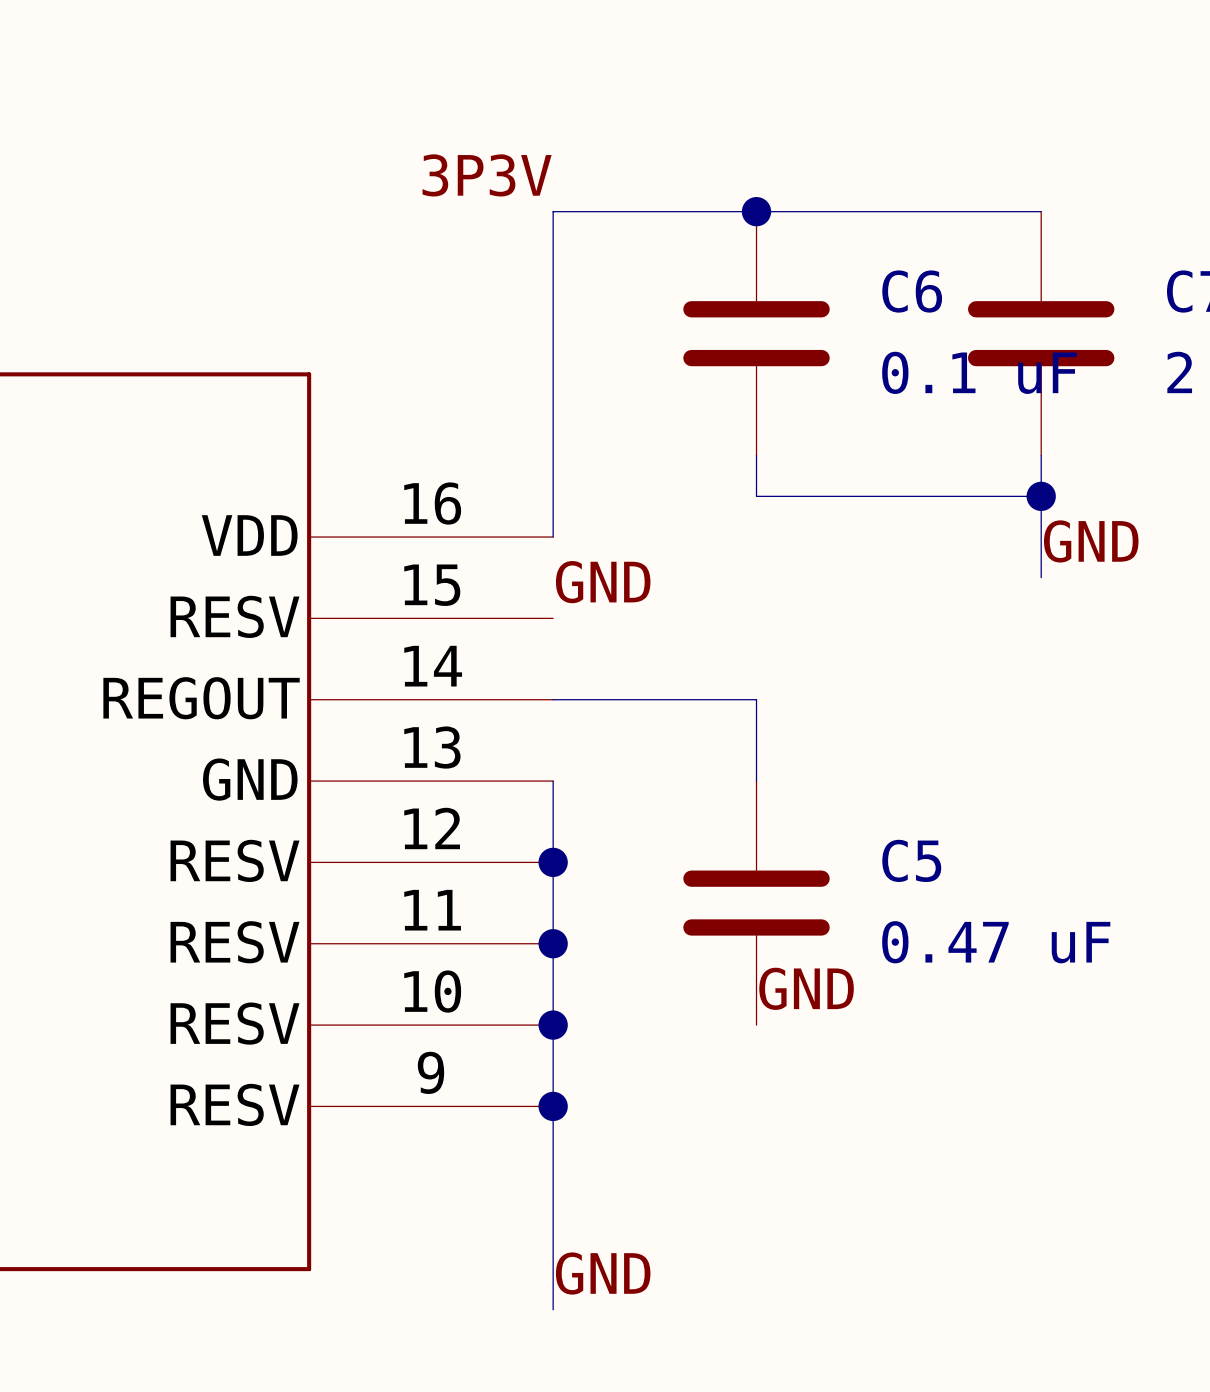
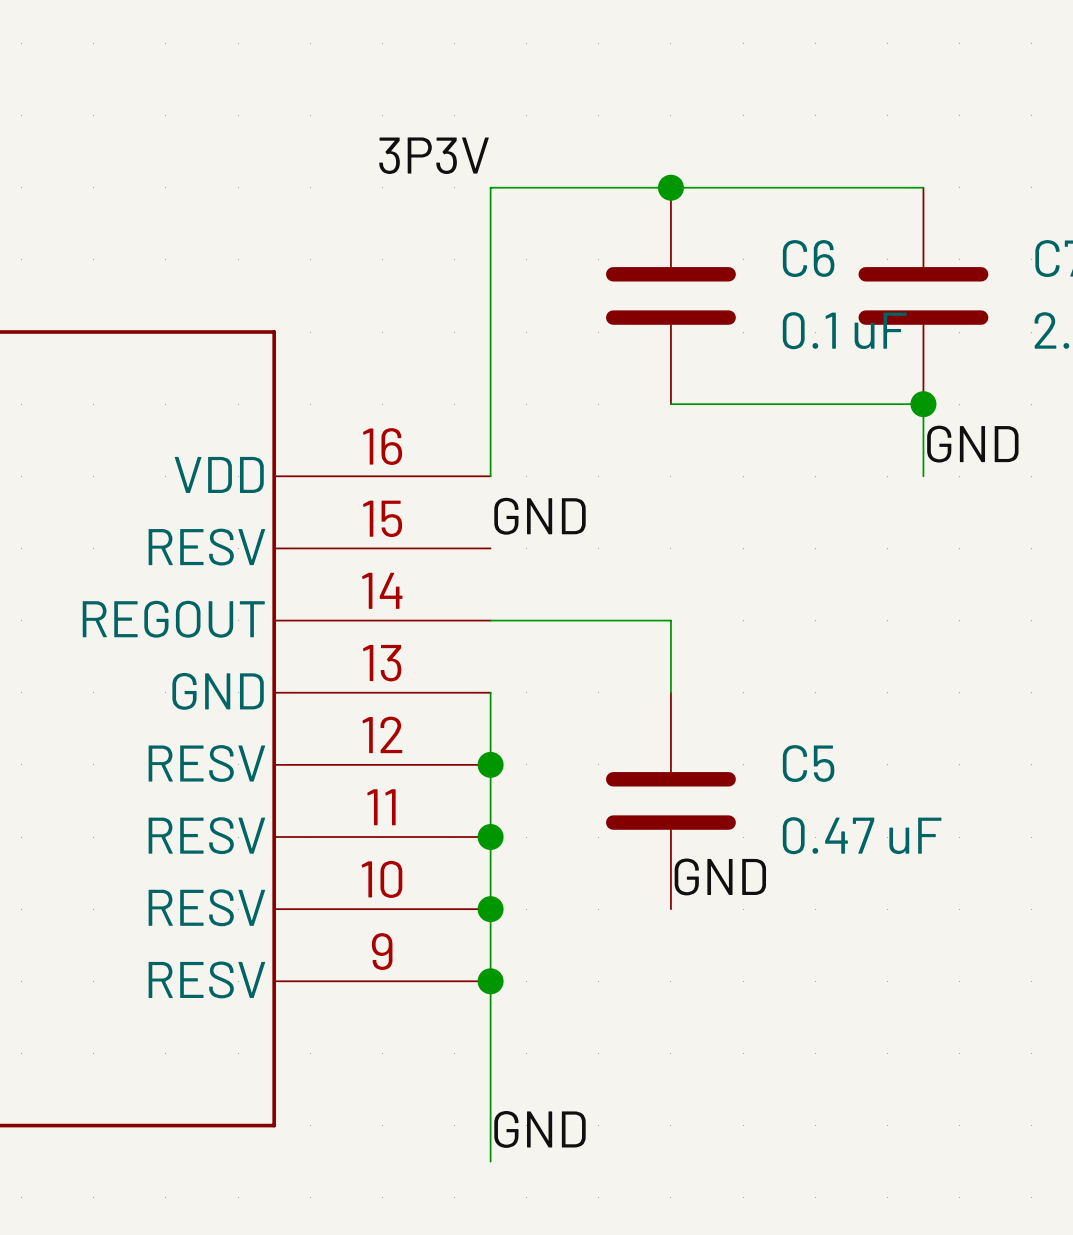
wire: (756, 455) (756, 496) (1041, 496) -> (670, 404) (923, 404)
junction position: (1041, 496) -> (923, 404)
wire: (1041, 537) (1041, 577) -> none
label position: GND (1091, 541) -> GND (972, 444)

